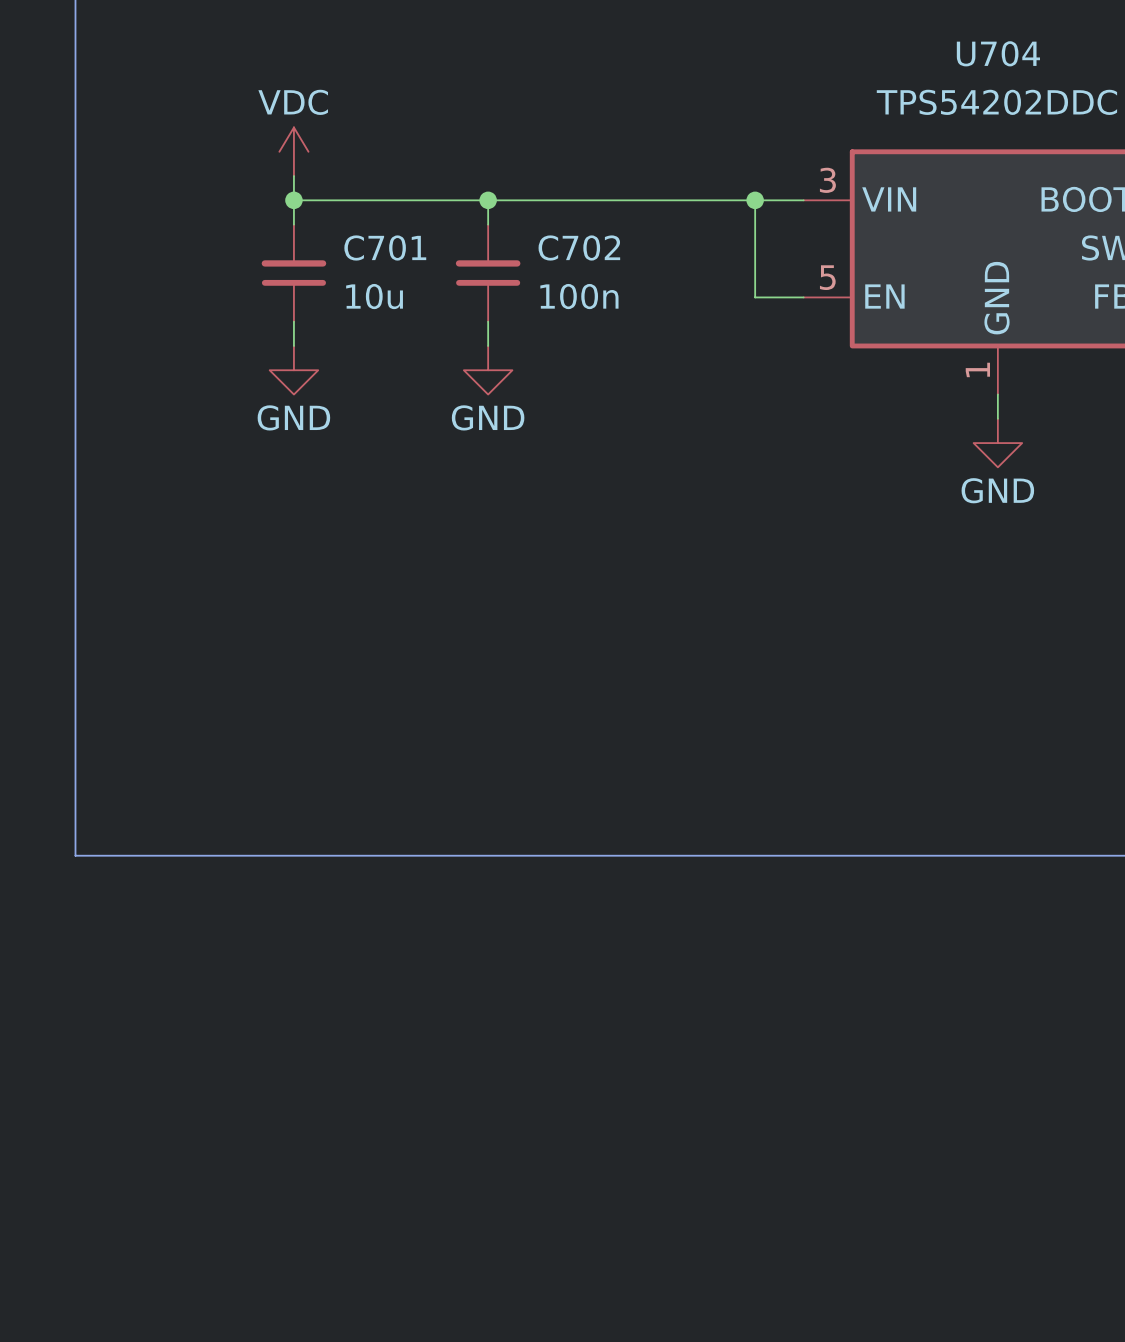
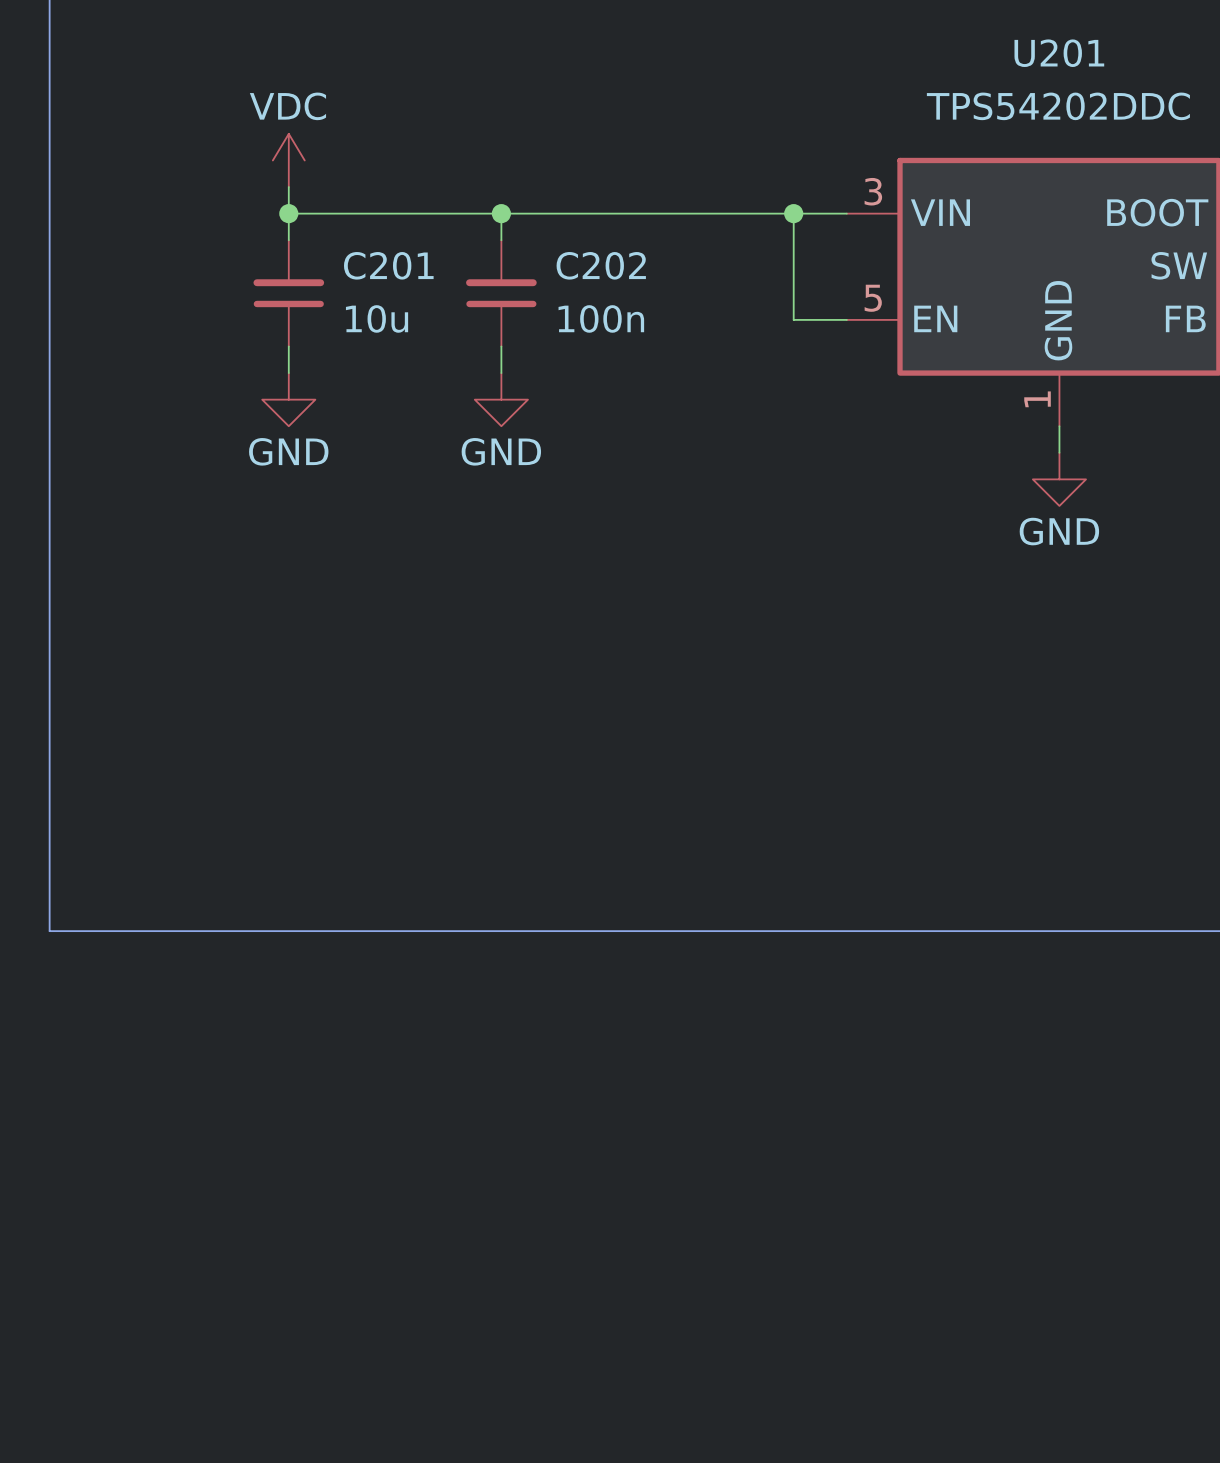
U704 name: U704 (998, 53) -> U201 (1059, 53)
C701 name: C701 (385, 247) -> C201 (388, 265)
C702 name: C702 (579, 247) -> C202 (601, 265)

